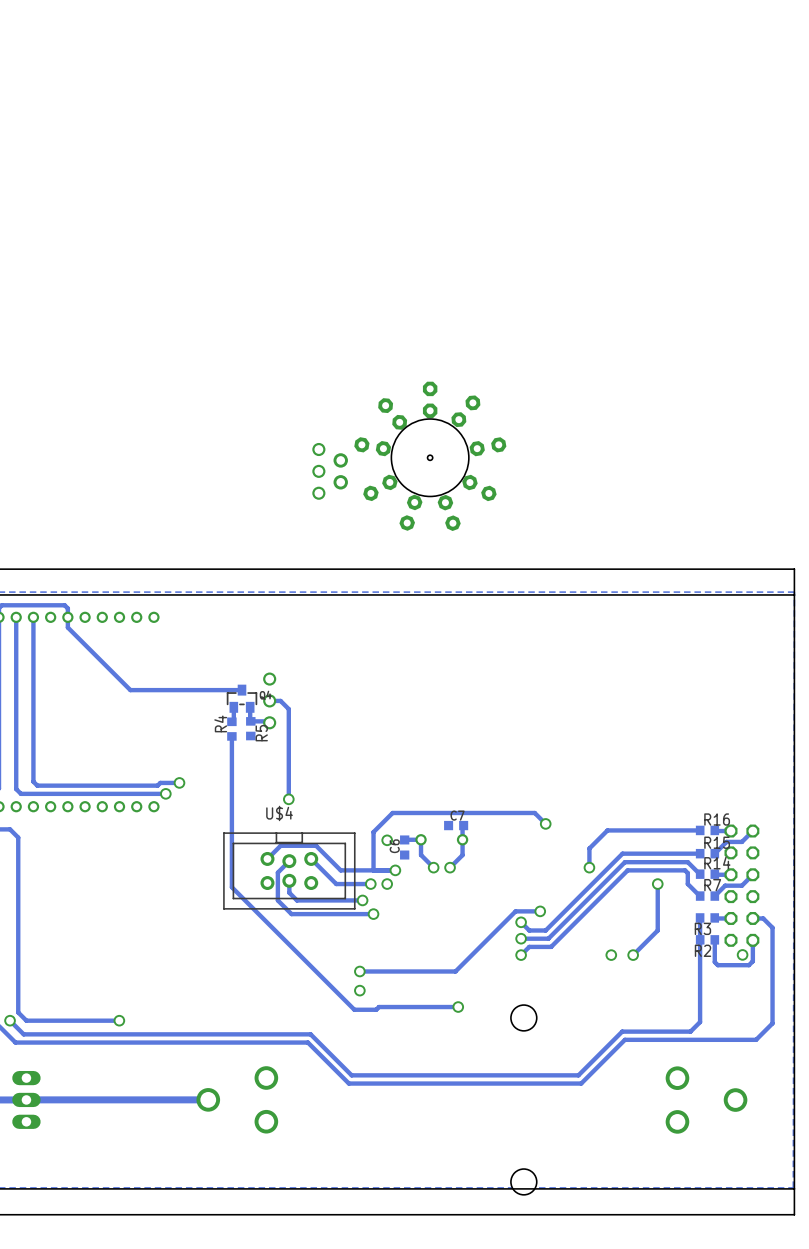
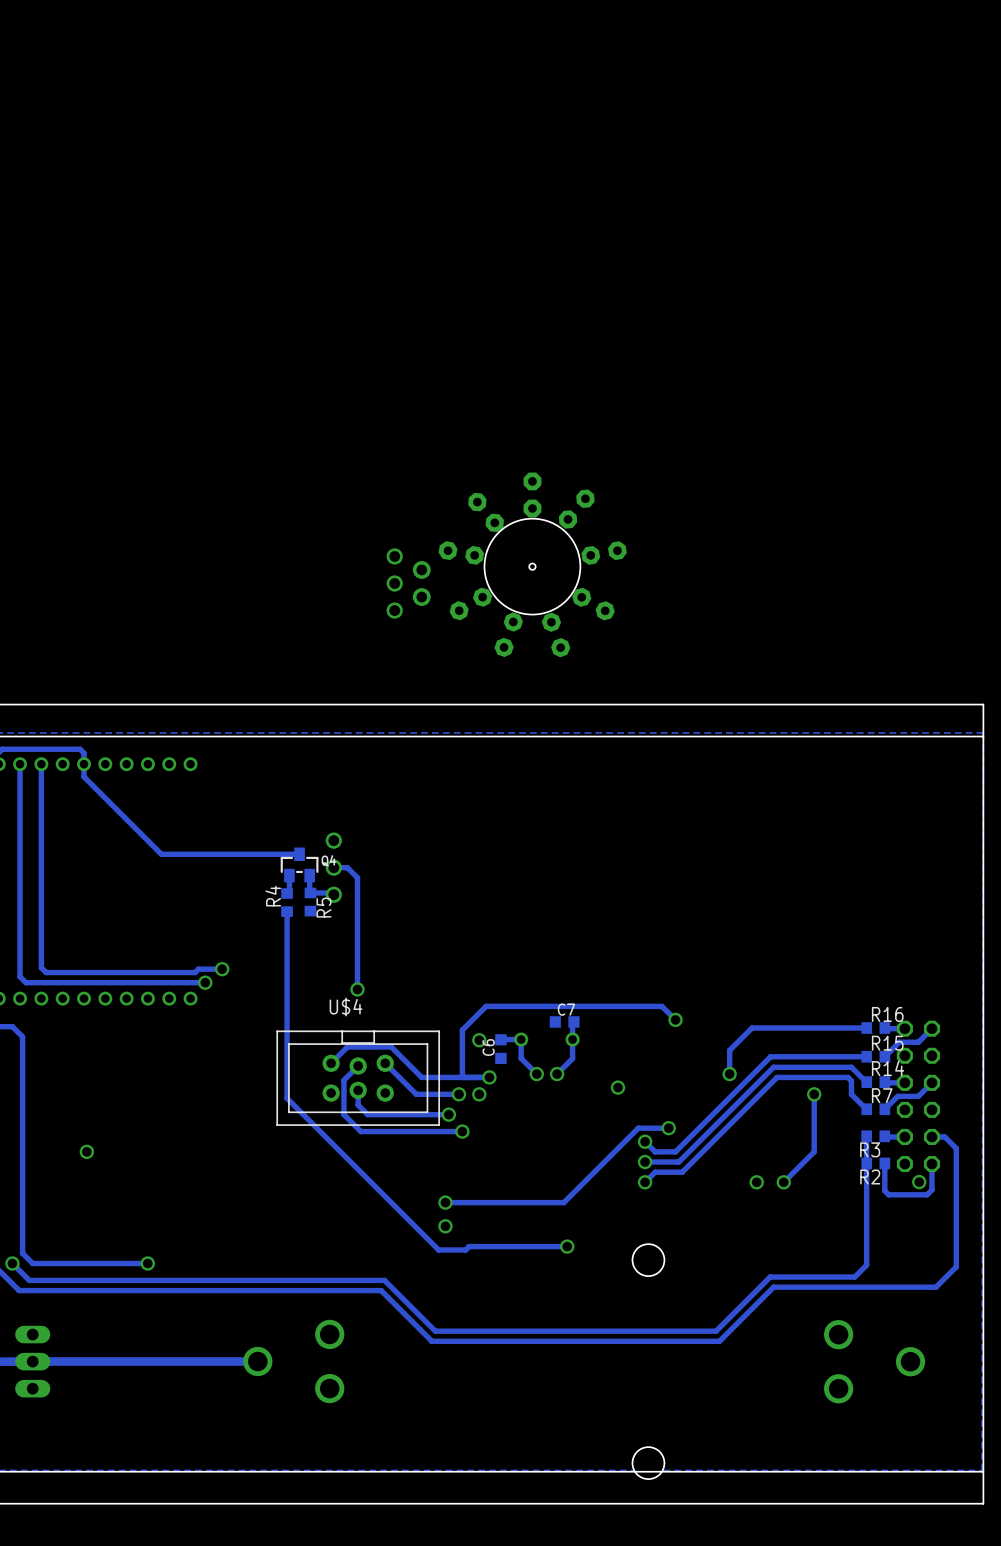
via: none -> (618, 1087)
via: none -> (86, 1151)

